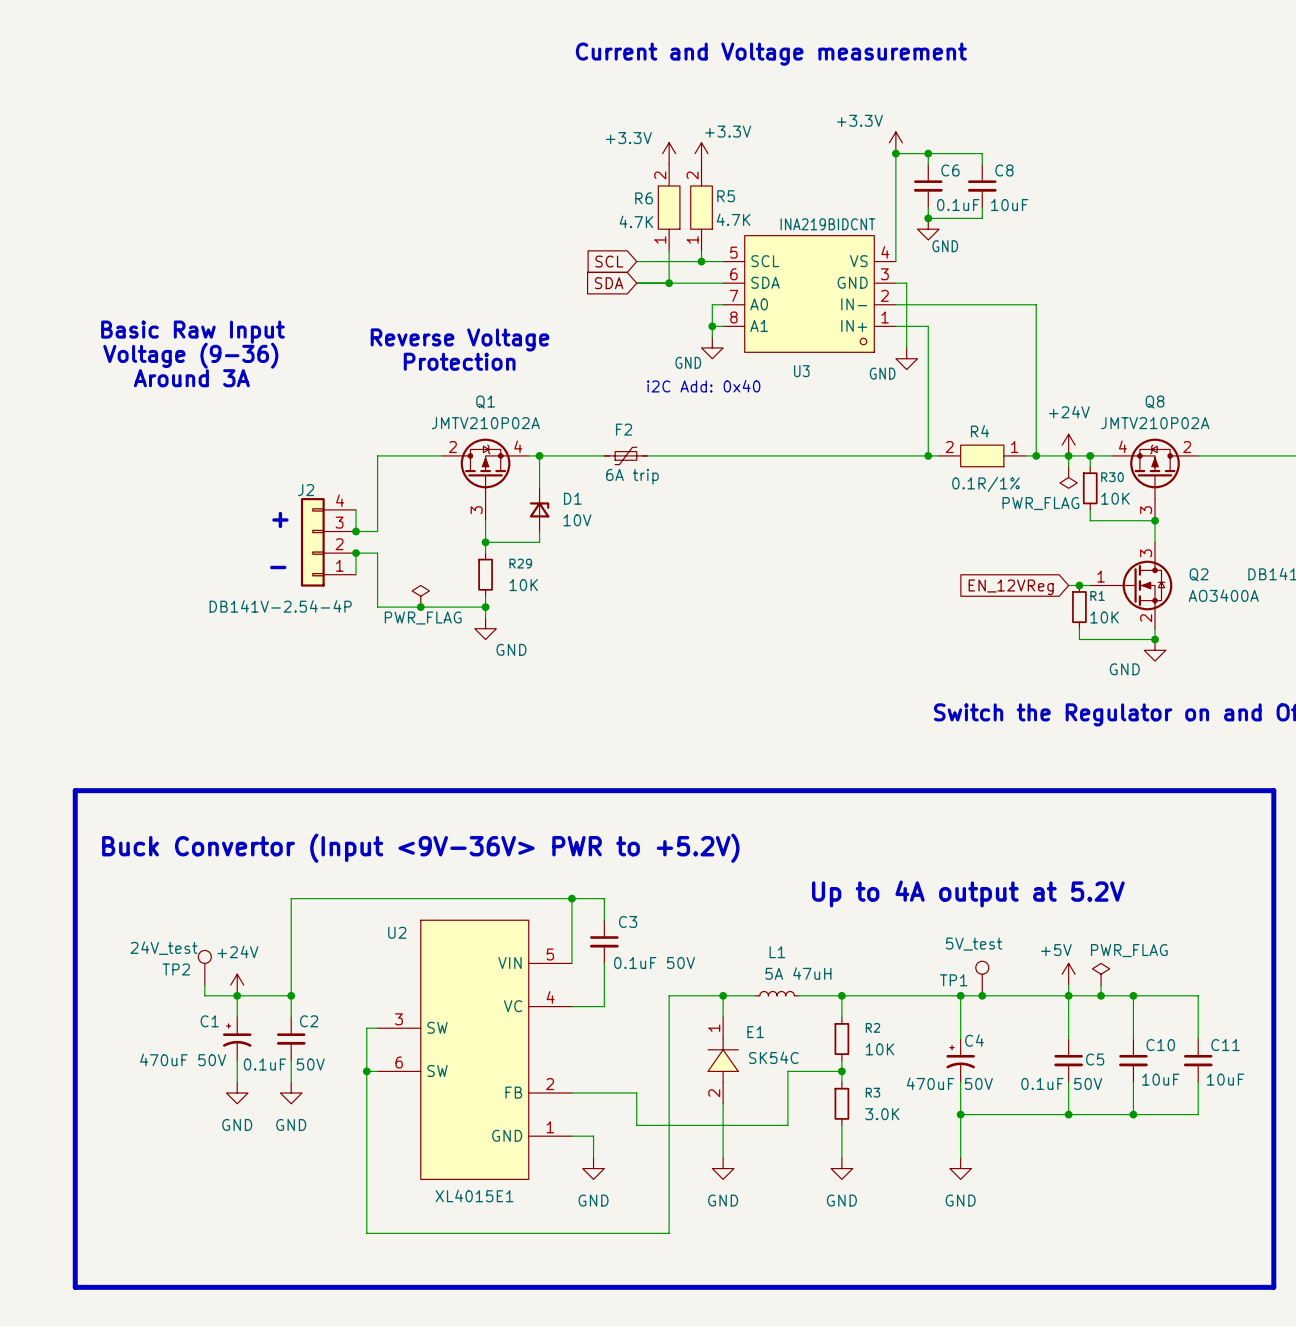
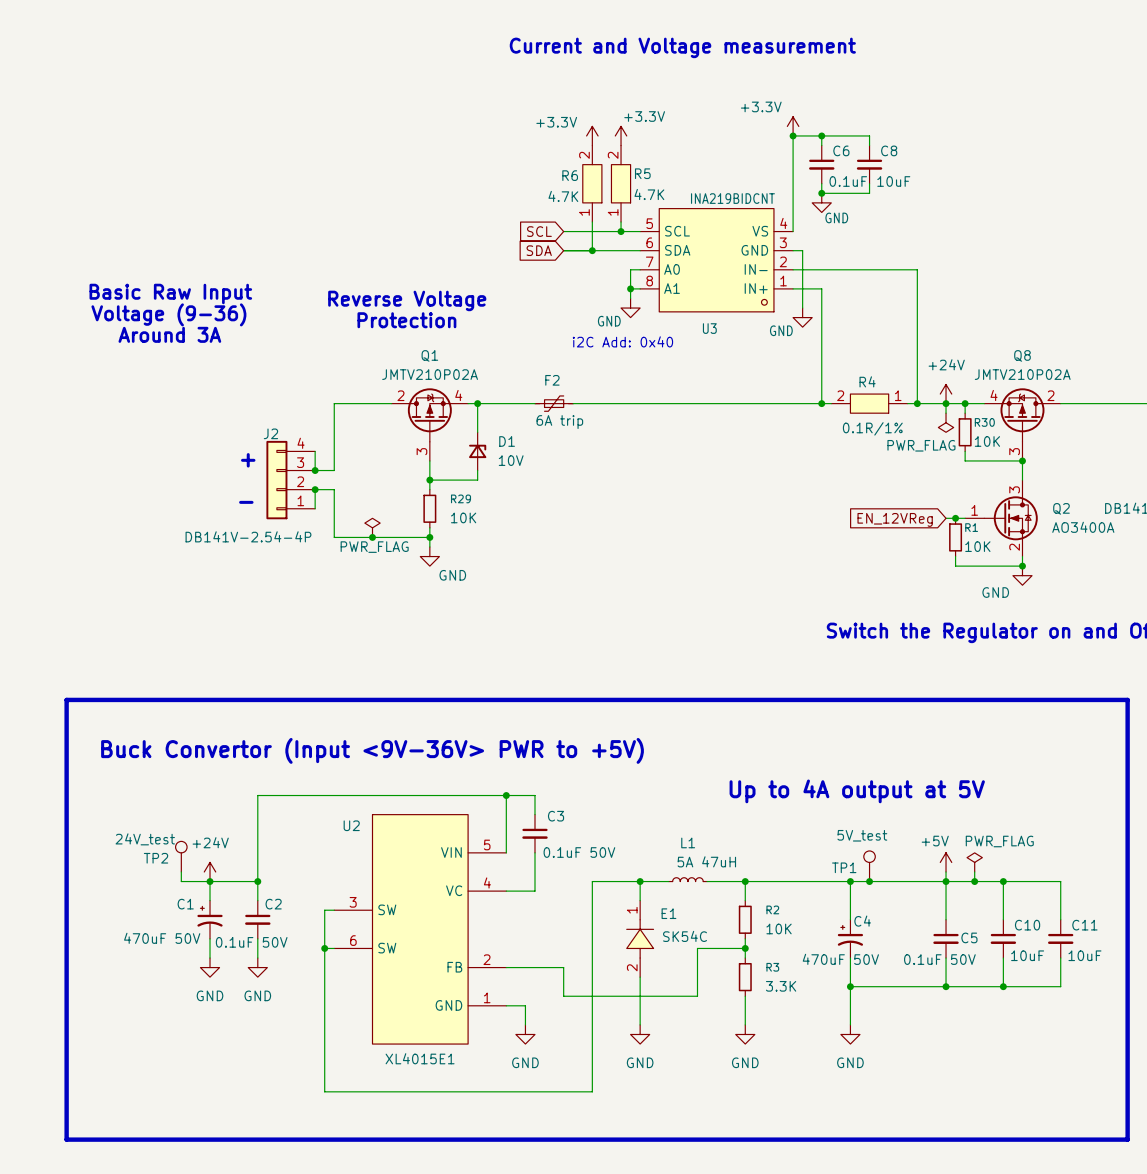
text: Buck Convertor (Input <9V-36V> PWR to +5.2V) (420, 848) -> Buck Convertor (Input <9V-36V> PWR to +5V) (372, 750)
text: Up to 4A output at 5.2V (968, 893) -> Up to 4A output at 5V (857, 791)
R3 value: 3.0K (882, 1114) -> 3.3K (781, 986)

